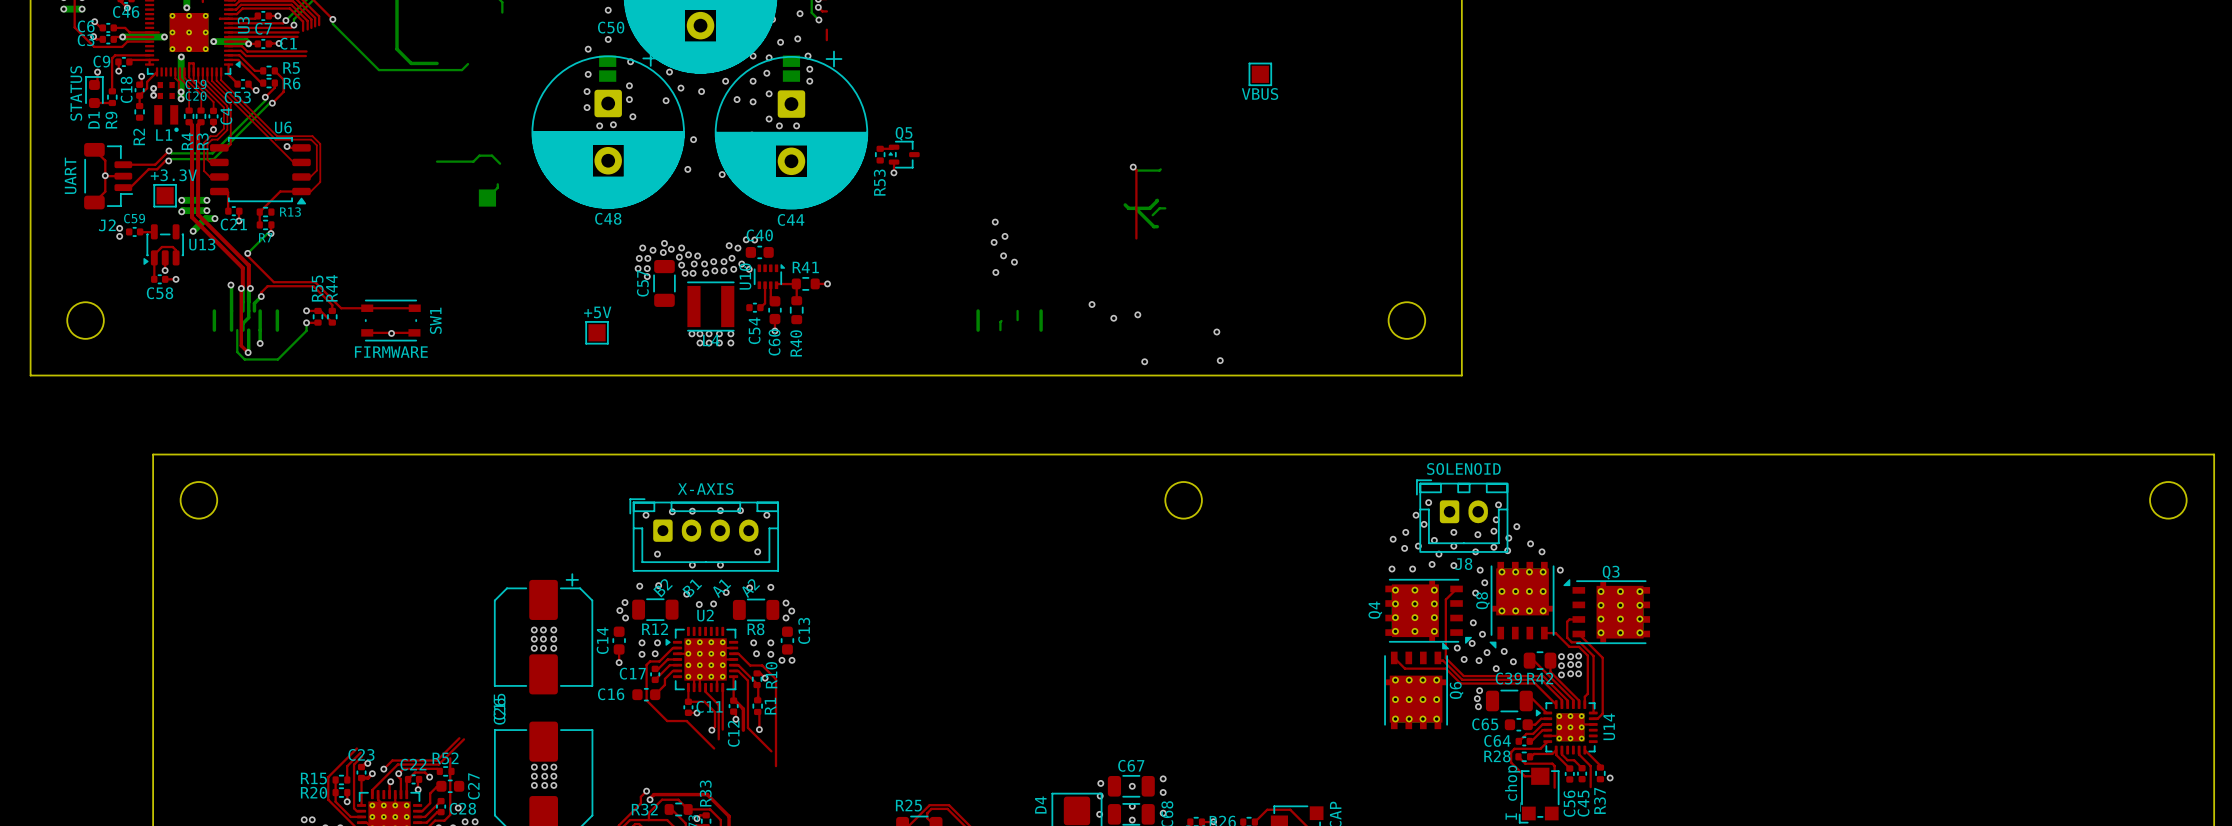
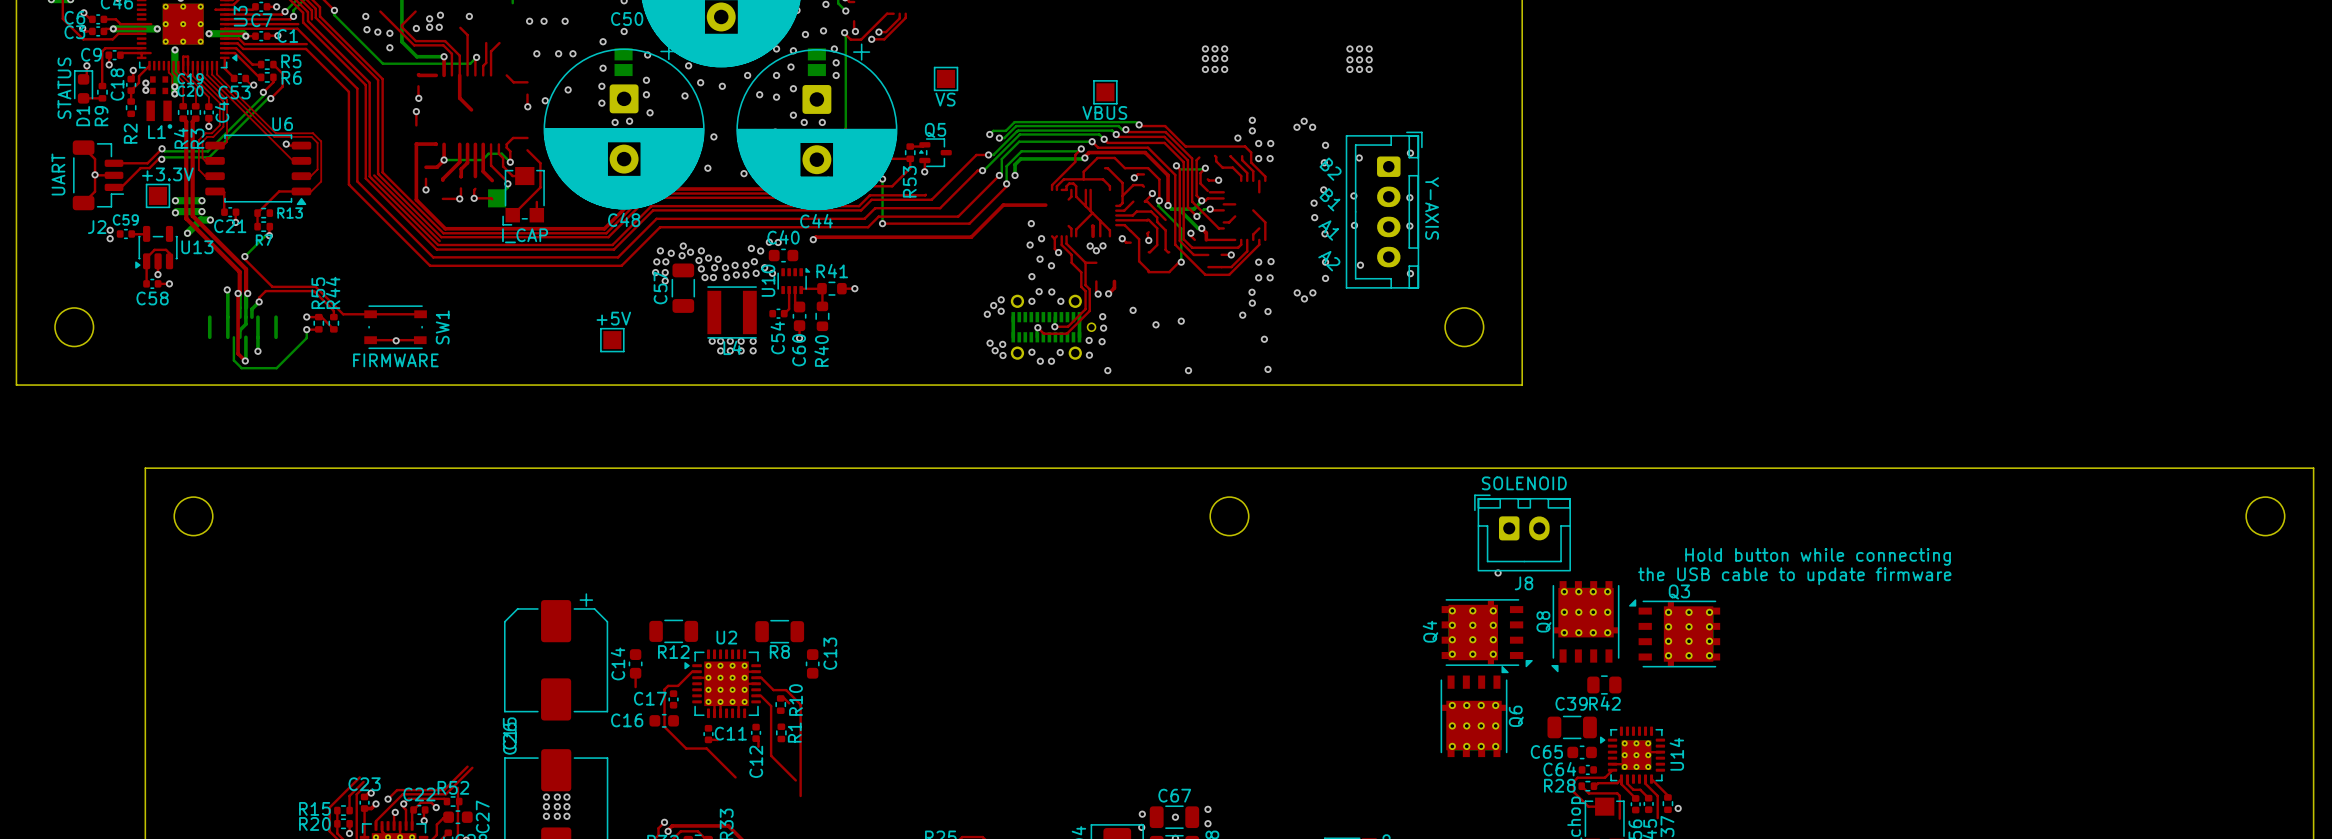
top track: none -> (380, 11) (414, 45) (443, 45) (451, 53) (451, 75)
top track: none -> (415, 11) (401, 27) (415, 41) (445, 41) (459, 55) (459, 98) (471, 109)
top track: none -> (893, 13) (887, 13) (861, 39) (850, 39) (844, 32)
top track: none -> (899, 13) (899, 18) (886, 32) (878, 32)
top track: none -> (905, 13) (905, 17) (884, 39) (871, 39)
via: none -> (440, 15)
top track: none -> (320, 16) (382, 79) (382, 172) (443, 233) (606, 233) (646, 193) (853, 193) (868, 179) (882, 179)
via: none -> (365, 16)
via: none -> (469, 16)
top track: none -> (315, 17) (378, 80) (379, 174)
via: none -> (429, 18)
top track: none -> (307, 21) (369, 82) (371, 177)
via: none -> (529, 21)
via: none -> (544, 21)
via: none -> (565, 21)
top track: none -> (303, 22) (365, 85) (365, 178) (436, 249) (613, 249) (653, 210) (861, 210) (871, 199) (931, 199) (976, 154) (988, 154)
via: none -> (429, 27)
via: none -> (439, 27)
top track: none -> (460, 27) (467, 35) (467, 75)
top track: none -> (297, 28) (357, 88) (357, 181) (433, 257) (618, 257) (656, 218) (864, 218) (875, 208) (940, 208) (977, 170) (982, 170)
via: none -> (416, 28)
via: none -> (366, 29)
via: none -> (855, 31)
via: none -> (377, 32)
bottom track: none -> (844, 32) (845, 128)
via: none -> (844, 32)
via: none -> (878, 32)
via: none -> (389, 33)
via: none -> (871, 39)
top track: none -> (486, 43) (486, 62) (483, 65) (483, 75)
top track: none -> (499, 43) (491, 51) (491, 75)
via: none -> (389, 47)
top track: none -> (306, 48) (348, 91) (349, 184)
via: none -> (1205, 48)
via: none -> (1215, 48)
via: none -> (1224, 48)
via: none -> (1349, 48)
via: none -> (1359, 48)
via: none -> (1369, 48)
via: none -> (536, 53)
via: none -> (558, 53)
via: none -> (572, 53)
top track: none -> (444, 56) (444, 75)
via: none -> (444, 56)
top track: none -> (476, 57) (475, 75)
via: none -> (476, 57)
via: none -> (1205, 58)
via: none -> (1215, 58)
via: none -> (1224, 58)
via: none -> (1349, 59)
via: none -> (1359, 59)
via: none -> (1369, 59)
part position: (1260, 74) -> (1105, 92)
via: none -> (1205, 69)
via: none -> (1215, 69)
via: none -> (1224, 69)
via: none -> (1349, 69)
via: none -> (1359, 69)
via: none -> (1369, 69)
top track: none -> (418, 74) (436, 75)
top track: none -> (506, 75) (513, 82) (527, 82)
part: none -> VS (946, 78)
top track: none -> (418, 86) (418, 98)
via: none -> (568, 89)
top track: none -> (527, 94) (527, 106)
via: none -> (418, 98)
via: none -> (545, 100)
via: none -> (527, 106)
top track: none -> (416, 111) (416, 125)
via: none -> (416, 111)
via: none -> (1252, 120)
via: none -> (1304, 121)
top track: none -> (1139, 124) (1165, 126) (1185, 146) (1245, 146) (1251, 152) (1251, 162) (1265, 176) (1265, 180)
bottom track: none -> (1139, 124) (1136, 122) (1014, 122) (1005, 130) (993, 130) (989, 134)
via: none -> (1139, 124)
via: none -> (1296, 127)
via: none -> (1312, 127)
top track: none -> (845, 129) (875, 158) (910, 158) (910, 168) (892, 186) (866, 186) (855, 197) (647, 197) (608, 237) (441, 237) (379, 174)
top track: none -> (1125, 129) (1128, 132) (1165, 132) (1192, 158) (1192, 201) (1218, 228) (1223, 228)
bottom track: none -> (1125, 129) (1122, 129) (1118, 126) (1016, 126) (1004, 138) (999, 138)
via: none -> (1125, 129)
via: none -> (1252, 130)
via: none -> (989, 134)
top track: none -> (1116, 134) (1118, 136) (1164, 136) (1187, 160) (1187, 207) (1196, 216)
bottom track: none -> (1116, 134) (1112, 130) (1018, 130) (993, 154) (988, 154)
via: none -> (1116, 134)
top track: none -> (527, 137) (513, 137) (506, 144) (506, 147) (510, 151) (510, 162)
via: none -> (999, 138)
via: none -> (1237, 138)
top track: none -> (1104, 139) (1107, 142) (1164, 142) (1183, 162) (1183, 239) (1192, 247) (1238, 247) (1241, 244) (1241, 239)
bottom track: none -> (1104, 139) (1099, 134) (1019, 134) (982, 170)
via: none -> (1104, 139)
top track: none -> (1092, 141) (1098, 147) (1148, 147) (1175, 174) (1175, 244) (1205, 274) (1229, 274) (1259, 244) (1259, 239)
bottom track: none -> (1092, 141) (1019, 141) (1001, 159) (1001, 173) (999, 175)
via: none -> (1092, 141)
via: none -> (1258, 143)
via: none -> (1270, 143)
top track: none -> (436, 144) (416, 144) (416, 199) (445, 228) (604, 228) (644, 189) (810, 189) (813, 186)
top track: none -> (444, 144) (444, 160) (437, 167) (426, 167)
top track: none -> (459, 144) (459, 162) (442, 180)
top track: none -> (467, 144) (467, 162) (461, 169) (460, 176)
top track: none -> (475, 144) (475, 176)
top track: none -> (483, 144) (483, 171) (492, 180)
top track: none -> (491, 144) (491, 165) (507, 183)
top track: none -> (498, 144) (498, 153) (503, 158) (503, 166) (512, 176) (524, 176)
via: none -> (1325, 145)
top track: none -> (1081, 148) (1075, 154) (1075, 161) (1052, 185) (1052, 189)
bottom track: none -> (1081, 148) (1078, 151) (1021, 151) (1006, 166) (1006, 183)
via: none -> (1081, 148)
top track: none -> (527, 150) (540, 163) (540, 187) (512, 215)
via: none -> (1410, 153)
via: none -> (988, 154)
top track: none -> (1215, 155) (1216, 161) (1222, 167) (1232, 167) (1241, 176) (1241, 180)
top track: none -> (1230, 156) (1247, 173) (1247, 180)
top track: none -> (1242, 156) (1242, 160) (1253, 171) (1253, 180)
top track: none -> (1084, 157) (1089, 152) (1145, 152) (1168, 175) (1168, 205)
bottom track: none -> (1084, 157) (1020, 158) (1015, 164) (1015, 175)
via: none -> (1084, 157)
top track: none -> (1199, 157) (1196, 160) (1196, 195) (1201, 200) (1207, 198) (1223, 198)
via: none -> (1359, 157)
via: none -> (1258, 158)
via: none -> (1270, 158)
via: none -> (444, 160)
via: none -> (510, 162)
via: none -> (1324, 162)
top track: none -> (1105, 168) (1107, 168) (1122, 182) (1122, 203) (1116, 205)
top track: none -> (1125, 168) (1148, 168) (1159, 179) (1159, 200)
top track: none -> (1124, 168) (1114, 157) (1097, 157) (1083, 171) (1083, 179)
top track: none -> (1205, 168) (1200, 173) (1200, 183) (1207, 190)
via: none -> (1205, 168)
via: none -> (982, 170)
top track: none -> (1143, 174) (1137, 174) (1134, 177)
top track: none -> (374, 175) (439, 241)
top track: none -> (999, 175) (958, 216) (878, 216) (868, 227) (660, 227) (621, 265) (430, 265) (349, 184)
via: none -> (999, 175)
via: none -> (1015, 175)
top track: none -> (371, 178) (438, 245) (612, 245) (651, 206) (859, 206) (869, 195) (925, 194)
via: none -> (1134, 177)
top track: none -> (426, 178) (426, 189)
bottom track: none -> (882, 179) (882, 223)
via: none -> (882, 179)
top track: none -> (1207, 179) (1218, 180)
via: none -> (1218, 180)
top track: none -> (1259, 180) (1259, 192)
via: none -> (507, 183)
via: none -> (1006, 183)
top track: none -> (1005, 184) (1006, 186) (969, 223) (882, 223)
top track: none -> (1143, 186) (1133, 185) (1122, 195)
top track: none -> (460, 188) (459, 198) (442, 198)
top track: none -> (475, 188) (474, 198) (492, 199)
via: none -> (426, 189)
top track: none -> (1056, 189) (1056, 186) (1063, 179) (1102, 179) (1109, 186) (1109, 189)
top track: none -> (1061, 189) (1066, 189) (1069, 183) (1073, 183) (1076, 186) (1076, 196) (1109, 230) (1109, 236)
top track: none -> (1071, 189) (1071, 196) (1068, 199)
top track: none -> (1085, 189) (1085, 206)
top track: none -> (1090, 189) (1090, 211)
via: none -> (1323, 189)
top track: none -> (1209, 192) (1223, 192)
top track: none -> (1152, 193) (1144, 201) (1147, 201) (1165, 219)
via: none -> (1152, 193)
via: none -> (1353, 195)
part: none -> I_CAP (523, 196)
via: none -> (1409, 197)
via: none -> (459, 198)
via: none -> (474, 198)
bottom track: none -> (1159, 200) (1158, 205) (1181, 228) (1181, 262)
via: none -> (1159, 200)
via: none -> (1201, 200)
top track: none -> (536, 201) (536, 215)
top track: none -> (1133, 201) (1124, 210) (1116, 210)
via: none -> (1314, 203)
top track: none -> (1223, 204) (1235, 204)
top track: none -> (1045, 205) (1003, 205) (971, 237) (815, 237) (813, 239)
via: none -> (1168, 205)
top track: none -> (1210, 209) (1223, 210)
via: none -> (1210, 209)
top track: none -> (1253, 210) (1265, 222) (1265, 239)
part: none -> (1384, 210)
top track: none -> (1092, 213) (1076, 229) (1076, 236)
top track: none -> (1116, 215) (1132, 215) (1136, 211) (1151, 211) (1157, 217) (1157, 221) (1165, 230) (1165, 249) (1169, 252)
via: none -> (1196, 216)
top track: none -> (1235, 216) (1229, 222) (1223, 222)
via: none -> (1314, 217)
top track: none -> (1116, 220) (1148, 219) (1157, 228) (1157, 245) (1148, 252)
top track: none -> (1100, 220) (1100, 236)
via: none -> (882, 223)
top track: none -> (1116, 225) (1124, 225) (1130, 231)
via: none -> (1354, 225)
top track: none -> (1068, 226) (1071, 228) (1071, 236)
top track: none -> (1092, 226) (1093, 236)
via: none -> (1409, 226)
top track: none -> (1201, 228) (1206, 233) (1206, 239) (1235, 239)
via: none -> (1201, 228)
top track: none -> (1259, 228) (1253, 234) (1253, 239)
top track: none -> (1130, 231) (1139, 239) (1139, 261) (1148, 272) (1169, 272) (1181, 262)
top track: none -> (1148, 232) (1148, 240)
top track: none -> (1190, 233) (1194, 239)
via: none -> (1190, 233)
via: none -> (1324, 233)
top track: none -> (1052, 236) (1054, 238)
top track: none -> (1056, 236) (1054, 238) (1054, 248) (1058, 252)
top track: none -> (1061, 236) (1061, 245) (1071, 254) (1071, 262) (1081, 272) (1081, 286) (1085, 291) (1085, 309) (1068, 326) (1054, 325)
top track: none -> (1066, 236) (1066, 243) (1085, 262)
top track: none -> (1122, 238) (1126, 242) (1130, 242)
via: none -> (1122, 238)
via: none -> (813, 239)
top track: none -> (1247, 239) (1247, 251) (1231, 267) (1208, 267)
via: none -> (1148, 240)
top track: none -> (1179, 240) (1193, 254) (1208, 254)
via: none -> (1090, 246)
via: none -> (1102, 245)
via: none -> (1096, 250)
via: none -> (1058, 252)
top track: none -> (1221, 254) (1231, 254)
via: none -> (1231, 254)
via: none -> (1181, 262)
via: none -> (1258, 262)
via: none -> (1271, 261)
via: none -> (1325, 262)
top track: none -> (1085, 262) (1085, 285) (1089, 289) (1089, 310) (1066, 333) (1043, 333) (1037, 327)
top track: none -> (1085, 262) (1096, 262)
via: none -> (1360, 265)
via: none -> (1410, 273)
via: none -> (1258, 277)
via: none -> (1270, 277)
via: none -> (1325, 278)
top track: none -> (1096, 281) (1096, 292) (1098, 294)
top track: none -> (1114, 281) (1114, 288) (1108, 293)
via: none -> (1039, 291)
via: none -> (1051, 291)
via: none -> (1252, 292)
via: none -> (1297, 292)
via: none -> (1312, 292)
via: none -> (1108, 293)
via: none -> (1098, 294)
via: none -> (1304, 298)
via: none -> (1001, 299)
via: none -> (1031, 301)
via: none -> (1060, 301)
via: none -> (1252, 303)
via: none -> (993, 305)
via: none -> (1001, 311)
via: none -> (1268, 311)
via: none -> (987, 314)
via: none -> (1242, 315)
via: none -> (1102, 316)
part: none -> (1045, 327)
via: none -> (1054, 326)
via: none -> (1037, 327)
via: none -> (1103, 328)
via: none -> (1089, 340)
via: none -> (1102, 341)
via: none -> (990, 343)
via: none -> (1002, 344)
via: none -> (995, 350)
via: none -> (1031, 352)
via: none -> (1060, 352)
via: none -> (1003, 355)
via: none -> (1089, 355)
via: none -> (1040, 361)
via: none -> (1051, 361)
via: none -> (1107, 370)
via: (1428, 502) -> none
via: (1498, 504) -> none
via: (720, 510) -> none
via: (740, 510) -> none
via: (672, 511) -> none
via: (692, 511) -> none
via: (646, 515) -> none
via: (766, 515) -> none
via: (1416, 515) -> none
via: (1496, 519) -> none
via: (1424, 524) -> none
via: (1516, 526) -> none
via: (1493, 531) -> none
via: (1405, 532) -> none
via: (1453, 532) -> none
via: (1477, 534) -> none
part: (704, 535) -> none
via: (1508, 538) -> none
text: none -> Hold button while connecting (1818, 556)
via: (1393, 539) -> none
via: (1434, 540) -> none
via: (1530, 543) -> none
via: (1418, 546) -> none
via: (1453, 546) -> none
via: (1493, 547) -> none
via: (1404, 548) -> none
via: (1507, 550) -> none
via: (757, 551) -> none
via: (1475, 551) -> none
via: (1542, 551) -> none
via: (657, 554) -> none
text: none -> the USB cable to update firmware (1794, 576)
via: (1432, 564) -> none
via: (692, 565) -> none
via: (720, 565) -> none
via: (1453, 565) -> none
via: (1392, 569) -> none
via: (1412, 569) -> none
via: (1480, 570) -> none
via: (1560, 570) -> none
via: (1484, 582) -> none
via: (658, 585) -> none
via: (639, 586) -> none
via: (749, 587) -> none
via: (770, 587) -> none
top track: (1456, 588) (1445, 599) (1445, 658) (1463, 676) (1543, 676) (1567, 700) (1567, 704) -> none
via: (726, 592) -> none
via: (1475, 593) -> none
via: (686, 594) -> none
via: (625, 602) -> none
via: (713, 603) -> none
via: (786, 603) -> none
via: (699, 604) -> none
via: (619, 610) -> none
via: (791, 611) -> none
via: (786, 617) -> none
via: (625, 618) -> none
top track: (1578, 619) (1569, 619) (1567, 621) (1567, 637) (1571, 642) (1579, 642) (1593, 656) (1593, 713) -> none
via: (1473, 622) -> none
via: (534, 629) -> none
via: (543, 629) -> none
via: (553, 629) -> none
top track: (1544, 633) (1555, 633) (1569, 646) (1579, 646) (1587, 655) (1587, 693) (1584, 696) (1584, 704) -> none
via: (1482, 634) -> none
top track: (1578, 634) (1602, 657) (1602, 713) (1597, 718) (1593, 718) -> none
via: (534, 639) -> none
via: (543, 639) -> none
via: (553, 639) -> none
via: (642, 642) -> none
via: (657, 642) -> none
via: (753, 642) -> none
via: (770, 642) -> none
via: (1472, 643) -> none
via: (534, 648) -> none
via: (543, 648) -> none
via: (553, 648) -> none
via: (1457, 648) -> none
via: (1504, 651) -> none
via: (1487, 652) -> none
via: (655, 653) -> none
via: (756, 653) -> none
via: (642, 654) -> none
via: (770, 654) -> none
via: (1561, 656) -> none
via: (1570, 656) -> none
via: (1578, 656) -> none
top track: (1394, 657) (1404, 668) (1445, 668) (1460, 683) (1535, 683) (1556, 704) -> none
top track: (1437, 657) (1462, 679) (1541, 679) (1561, 700) (1561, 704) -> none
top track: (677, 659) (667, 659) (658, 668) (655, 668) -> none
via: (1464, 659) -> none
via: (782, 660) -> none
via: (792, 660) -> none
via: (1479, 660) -> none
top track: (1529, 660) (1533, 660) (1573, 700) (1573, 704) -> none
top track: (1550, 660) (1550, 671) (1579, 700) (1579, 704) -> none
via: (1513, 661) -> none
via: (619, 662) -> none
via: (1570, 664) -> none
via: (1578, 664) -> none
top track: (677, 665) (669, 665) (655, 679) -> none
top track: (733, 665) (738, 665) (757, 683) (757, 700) -> none
via: (1561, 665) -> none
via: (1496, 668) -> none
top track: (677, 670) (672, 670) (664, 678) (664, 684) (655, 694) -> none
via: (1570, 673) -> none
via: (1578, 673) -> none
via: (1561, 674) -> none
top track: (733, 676) (733, 700) (743, 709) (743, 730) -> none
via: (765, 678) -> none
top track: (688, 687) (688, 701) (704, 701) (715, 712) (715, 727) (711, 730) -> none
top track: (705, 687) (705, 691) (718, 704) (718, 739) -> none
top track: (722, 687) (722, 729) -> none
via: (1479, 690) -> none
top track: (1526, 694) (1547, 713) -> none
via: (1477, 698) -> none
via: (1478, 706) -> none
top track: (757, 711) (759, 713) (759, 729) -> none
via: (696, 713) -> none
top track: (1547, 718) (1541, 718) (1535, 724) (1527, 724) -> none
via: (735, 719) -> none
top track: (1547, 724) (1542, 724) (1533, 733) (1526, 733) (1518, 741) -> none
via: (759, 729) -> none
via: (711, 730) -> none
top track: (1547, 730) (1542, 730) (1529, 741) -> none

